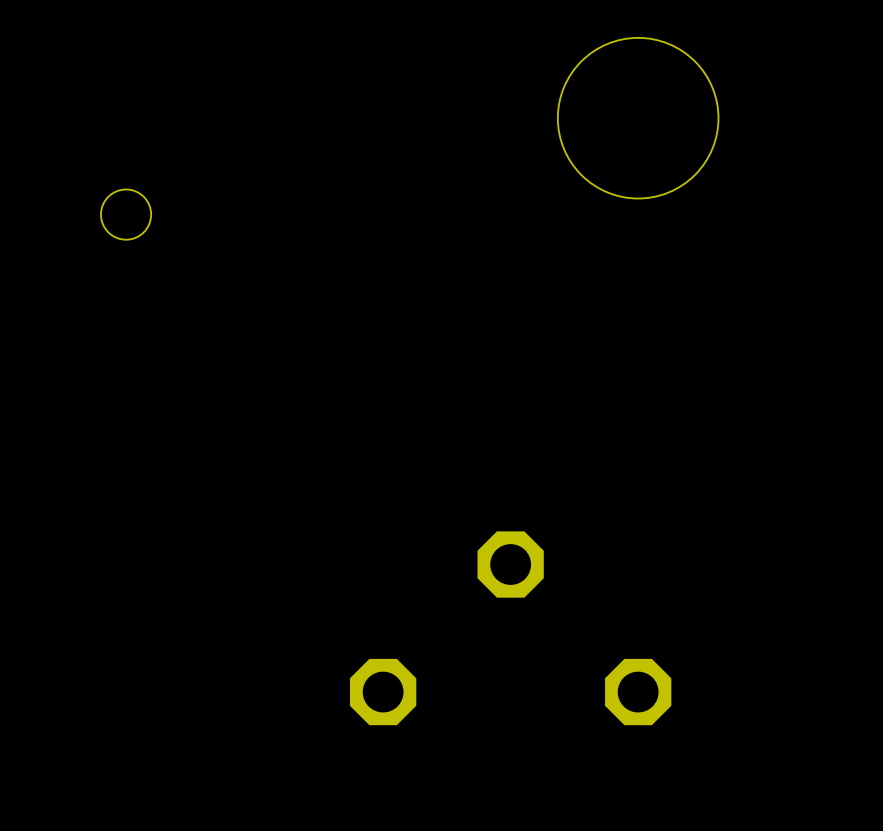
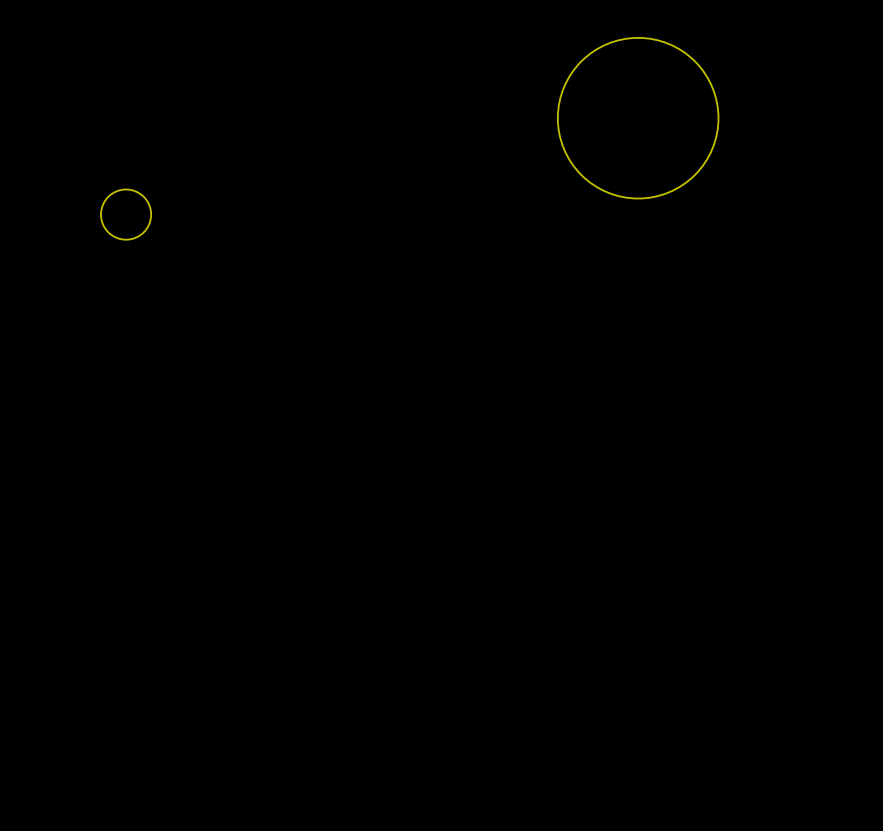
part: (510, 628) -> none

